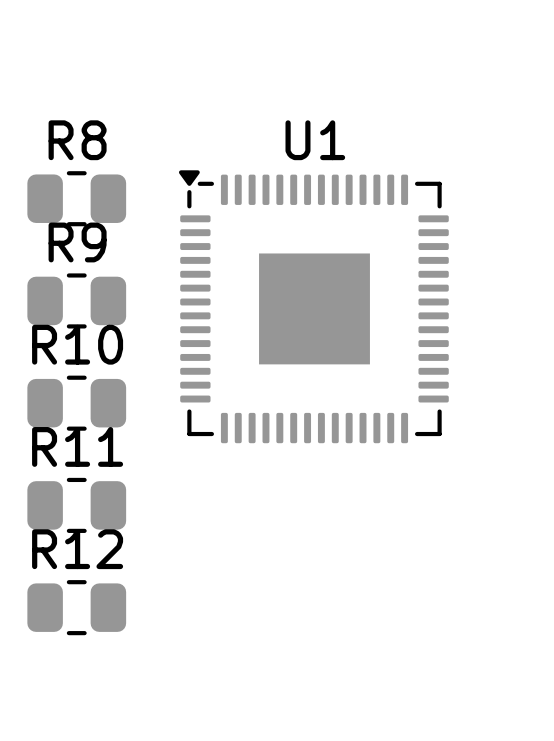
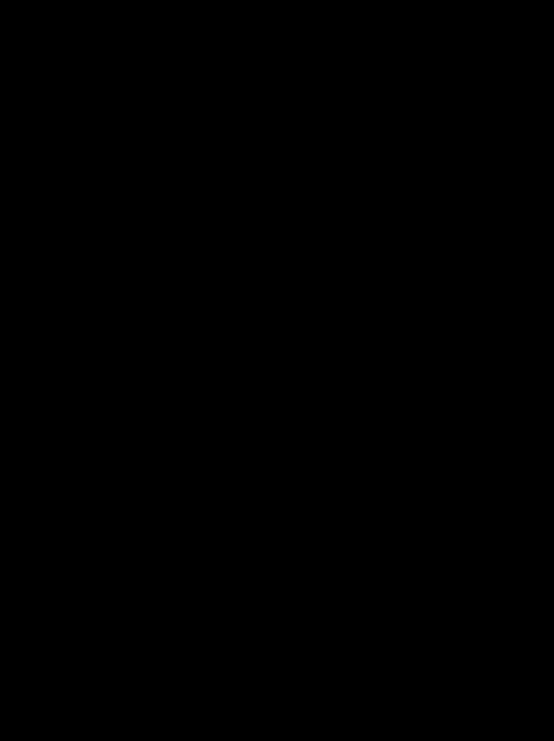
R8: (76, 198) -> none
R9: (76, 300) -> none
U1: (313, 306) -> none
R10: (76, 403) -> none
R11: (76, 505) -> none
R12: (76, 607) -> none

